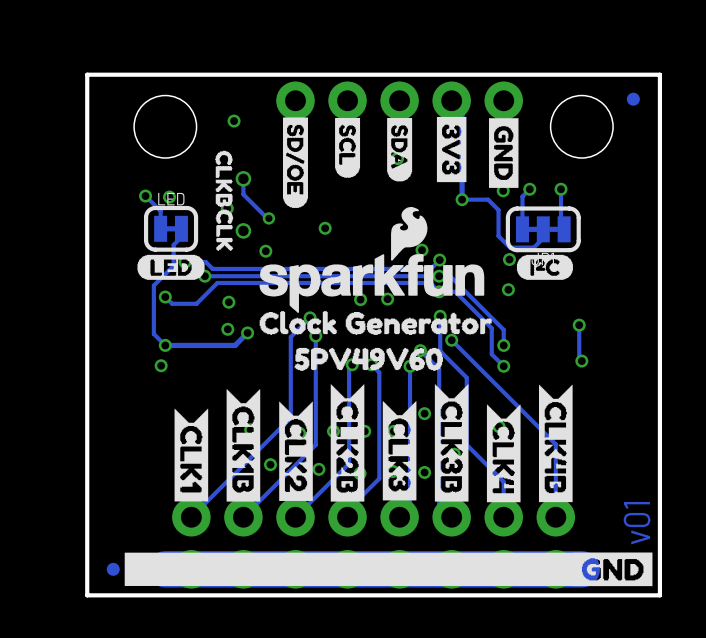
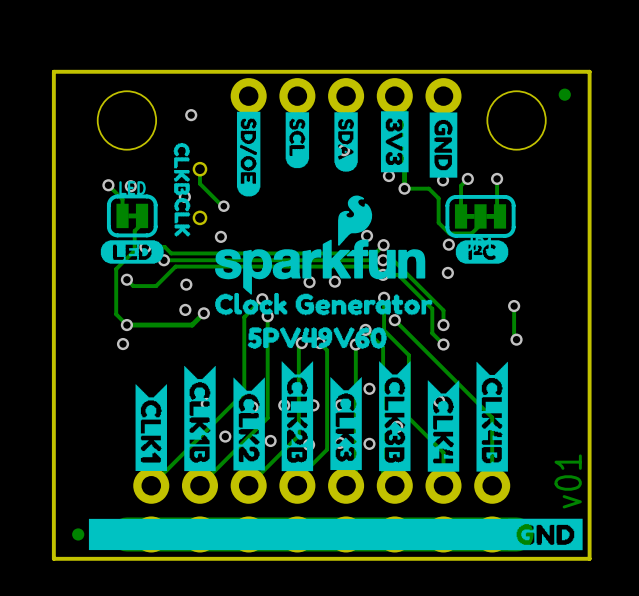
via: none -> (388, 176)
via: (325, 228) -> none

